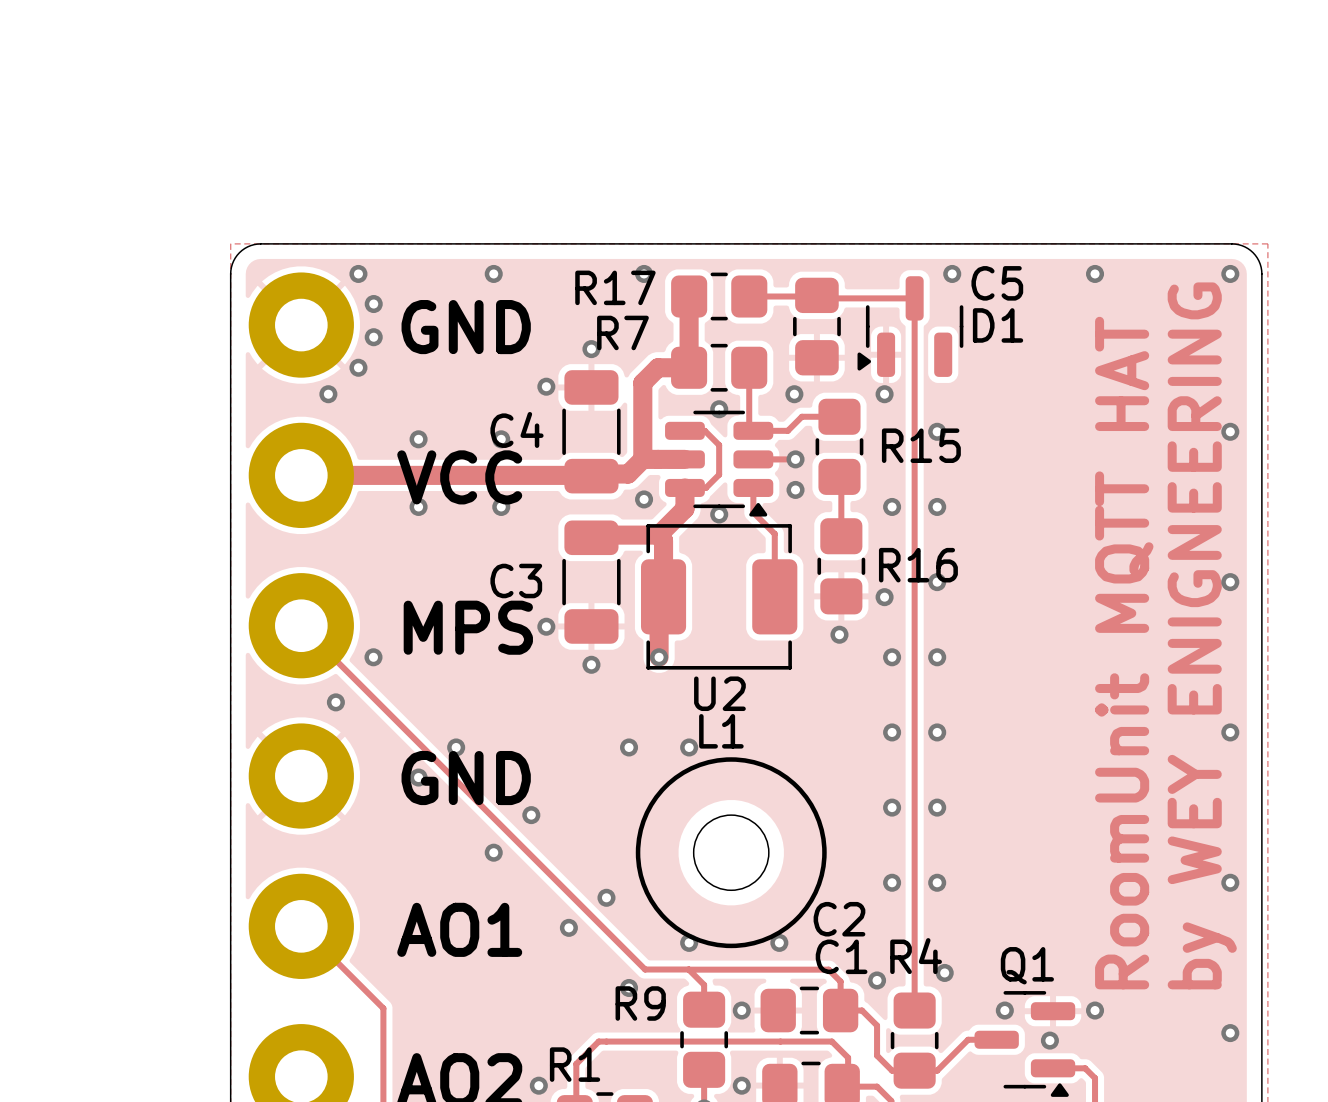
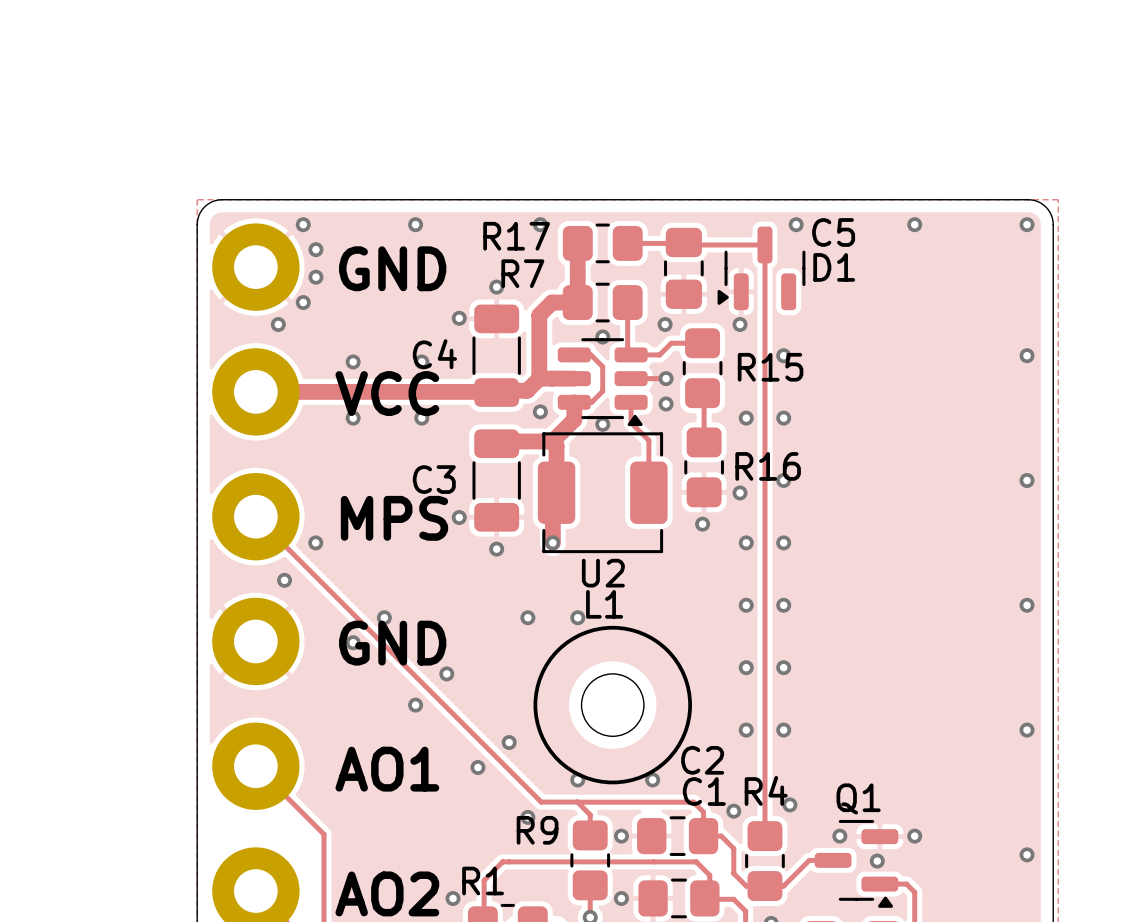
text: by WEY ENIGNEERING (1202, 635) -> none
text: RoomUnit MQTT HAT (1124, 653) -> none

